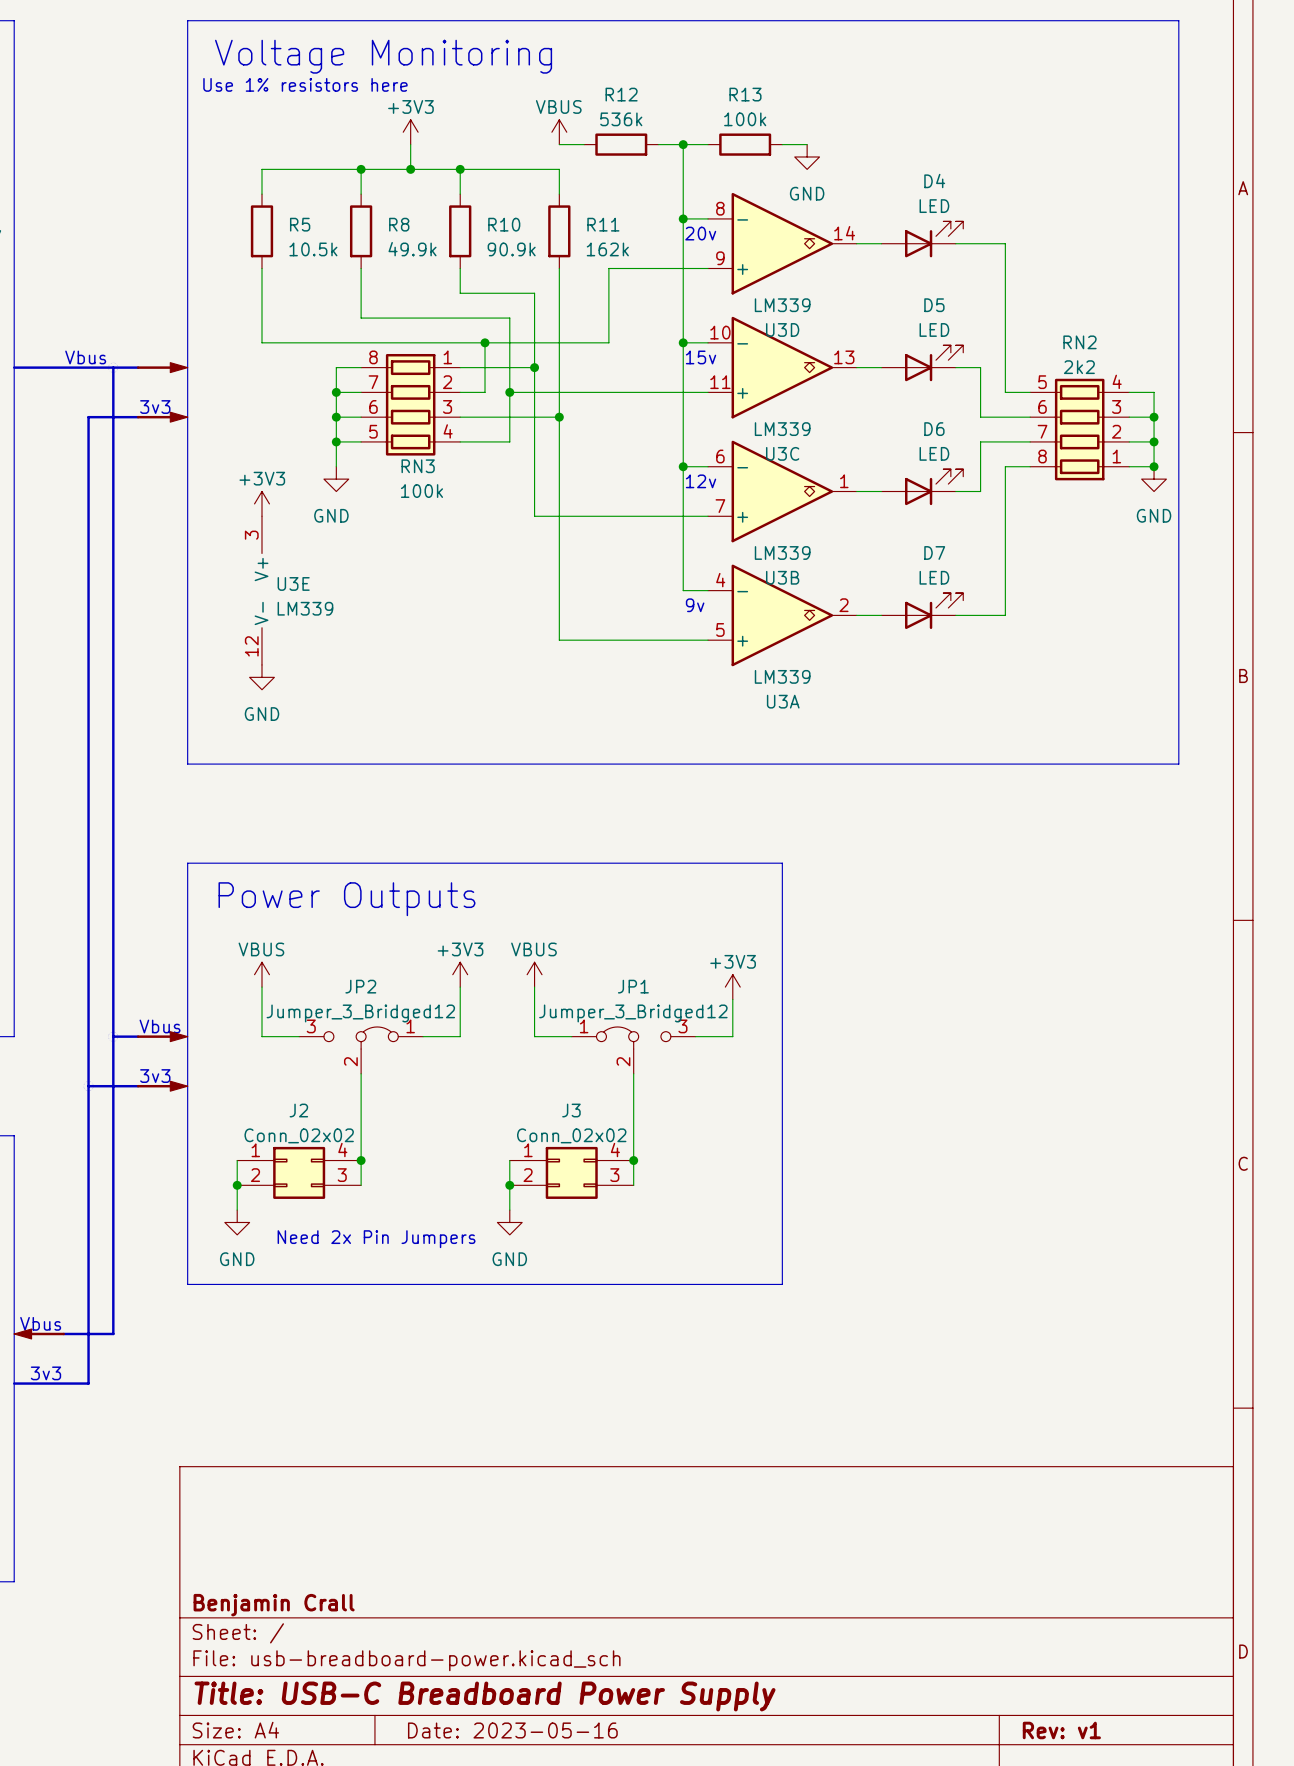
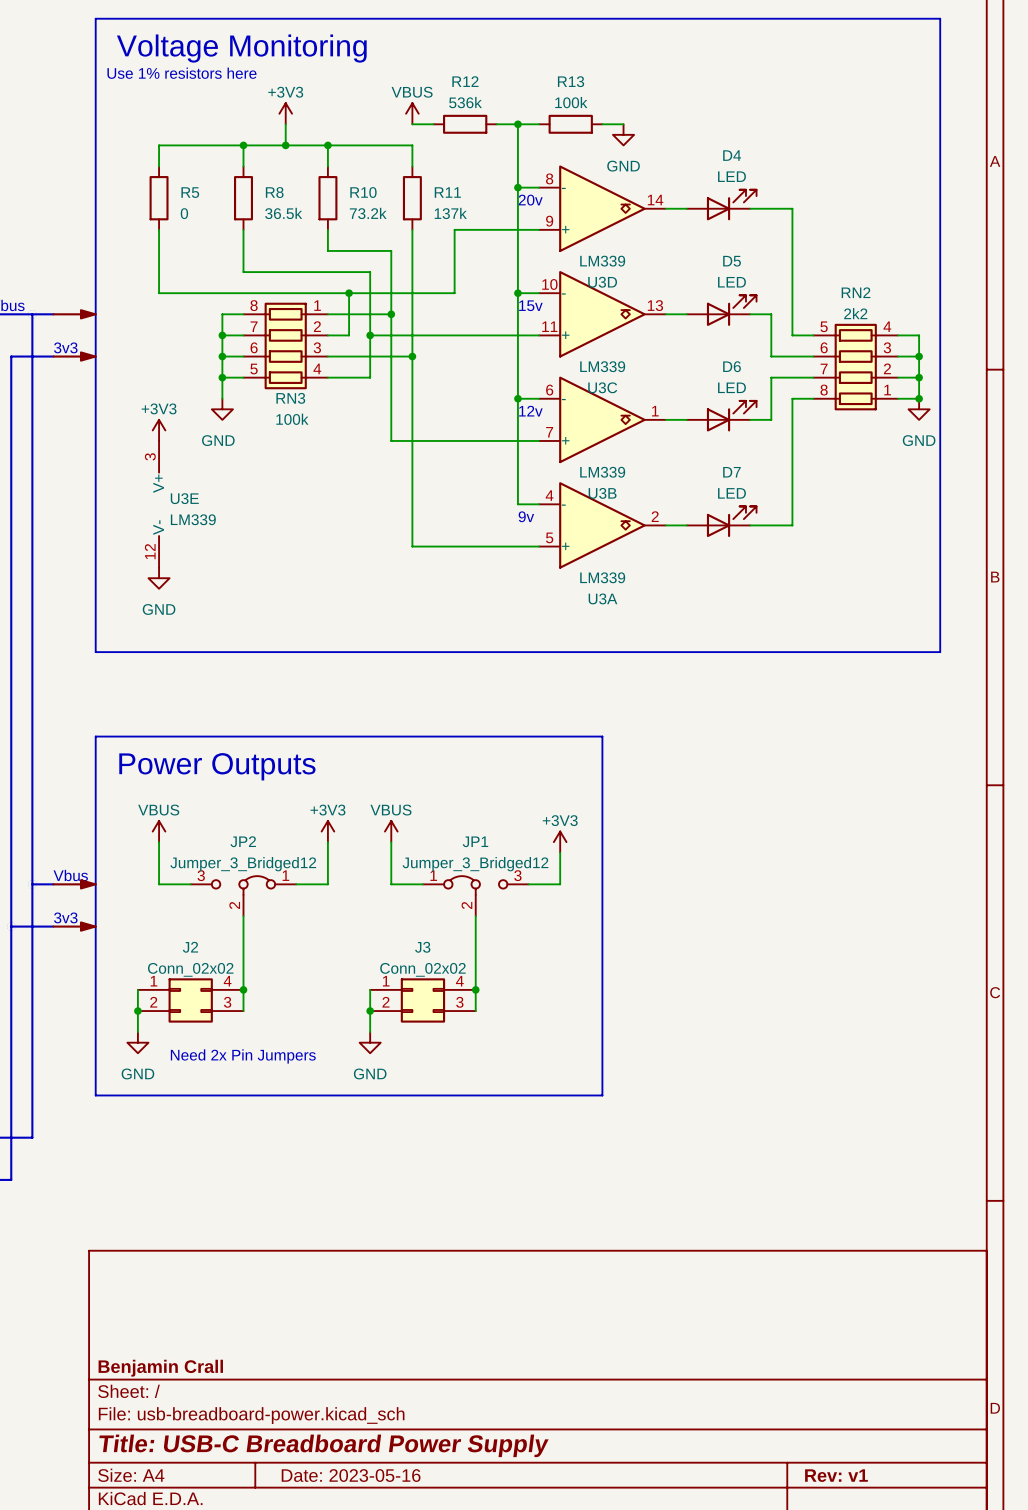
R5 value: 10.5k (313, 249) -> 0 (184, 213)
R8 value: 49.9k (412, 249) -> 36.5k (283, 213)
R10 value: 90.9k (511, 249) -> 73.2k (368, 213)
R11 value: 162k (607, 249) -> 137k (450, 213)

